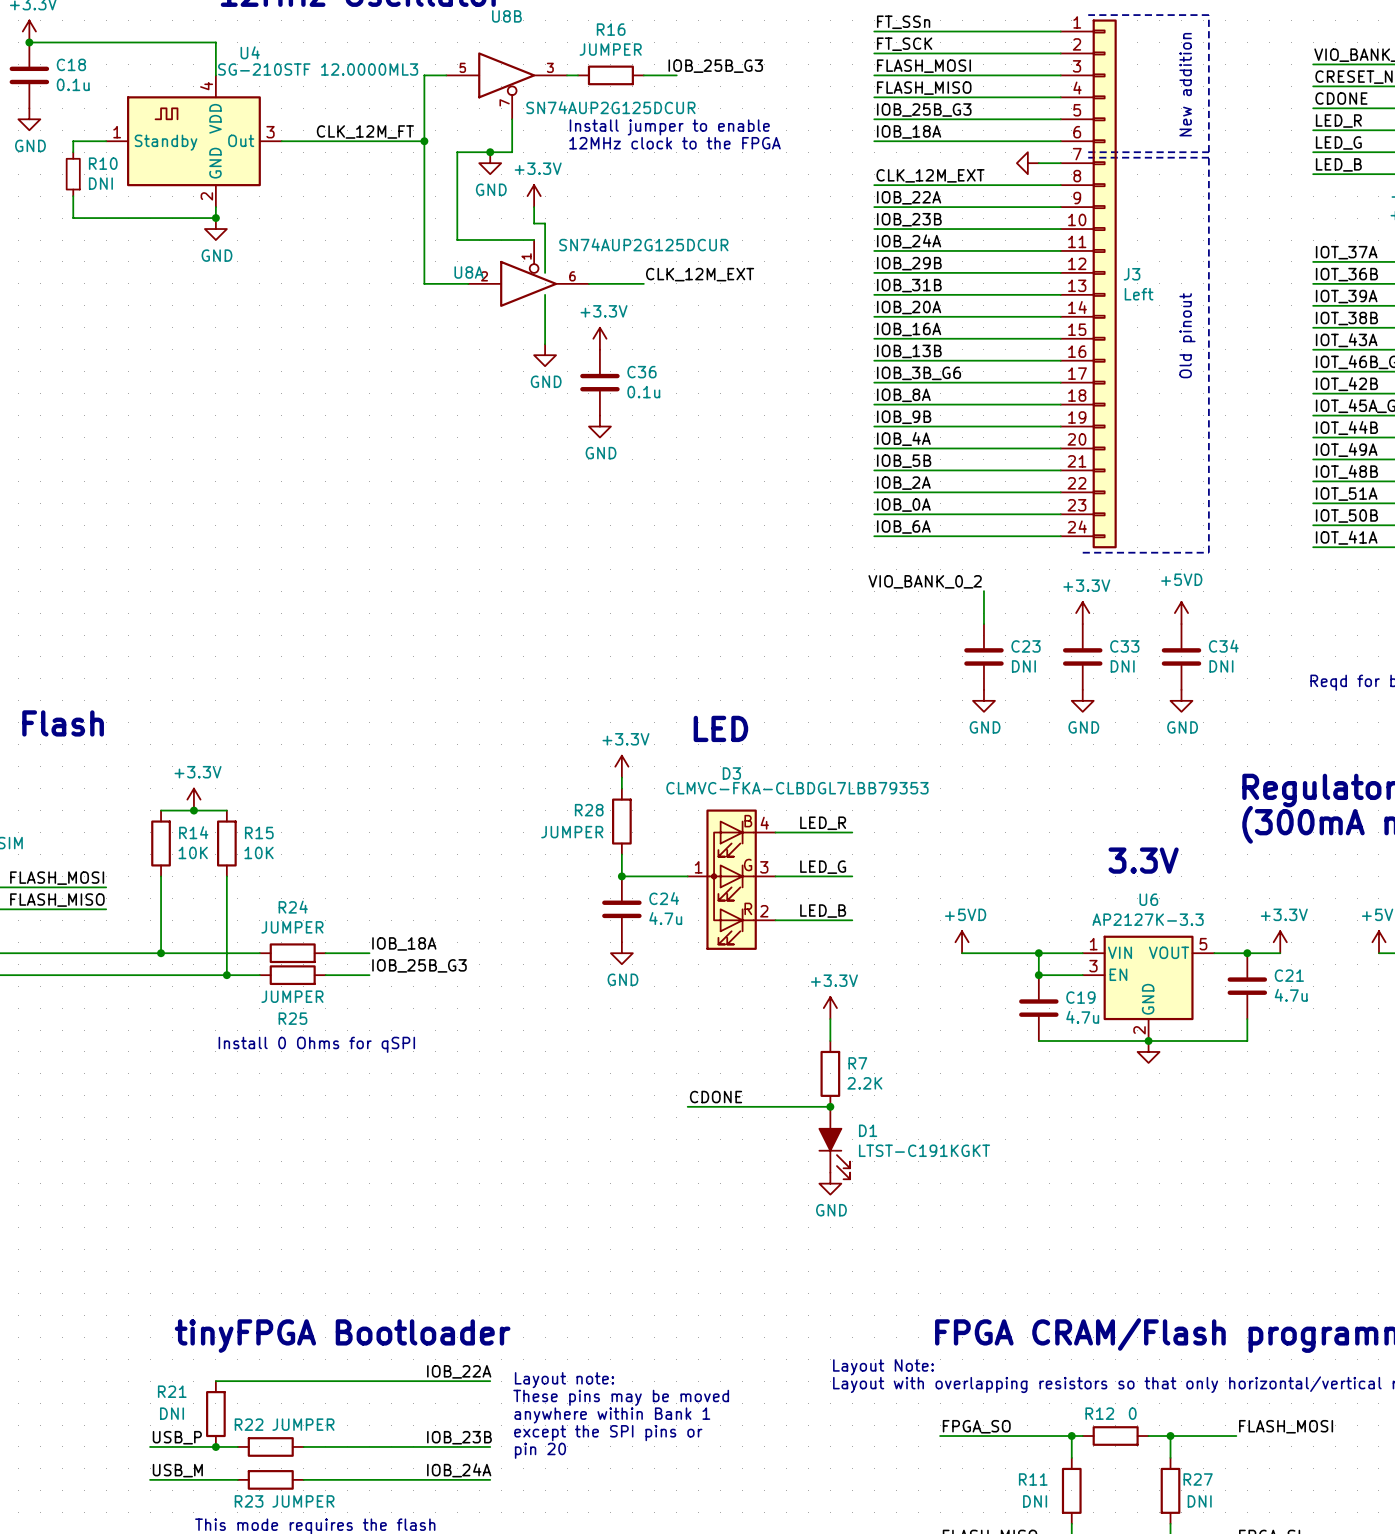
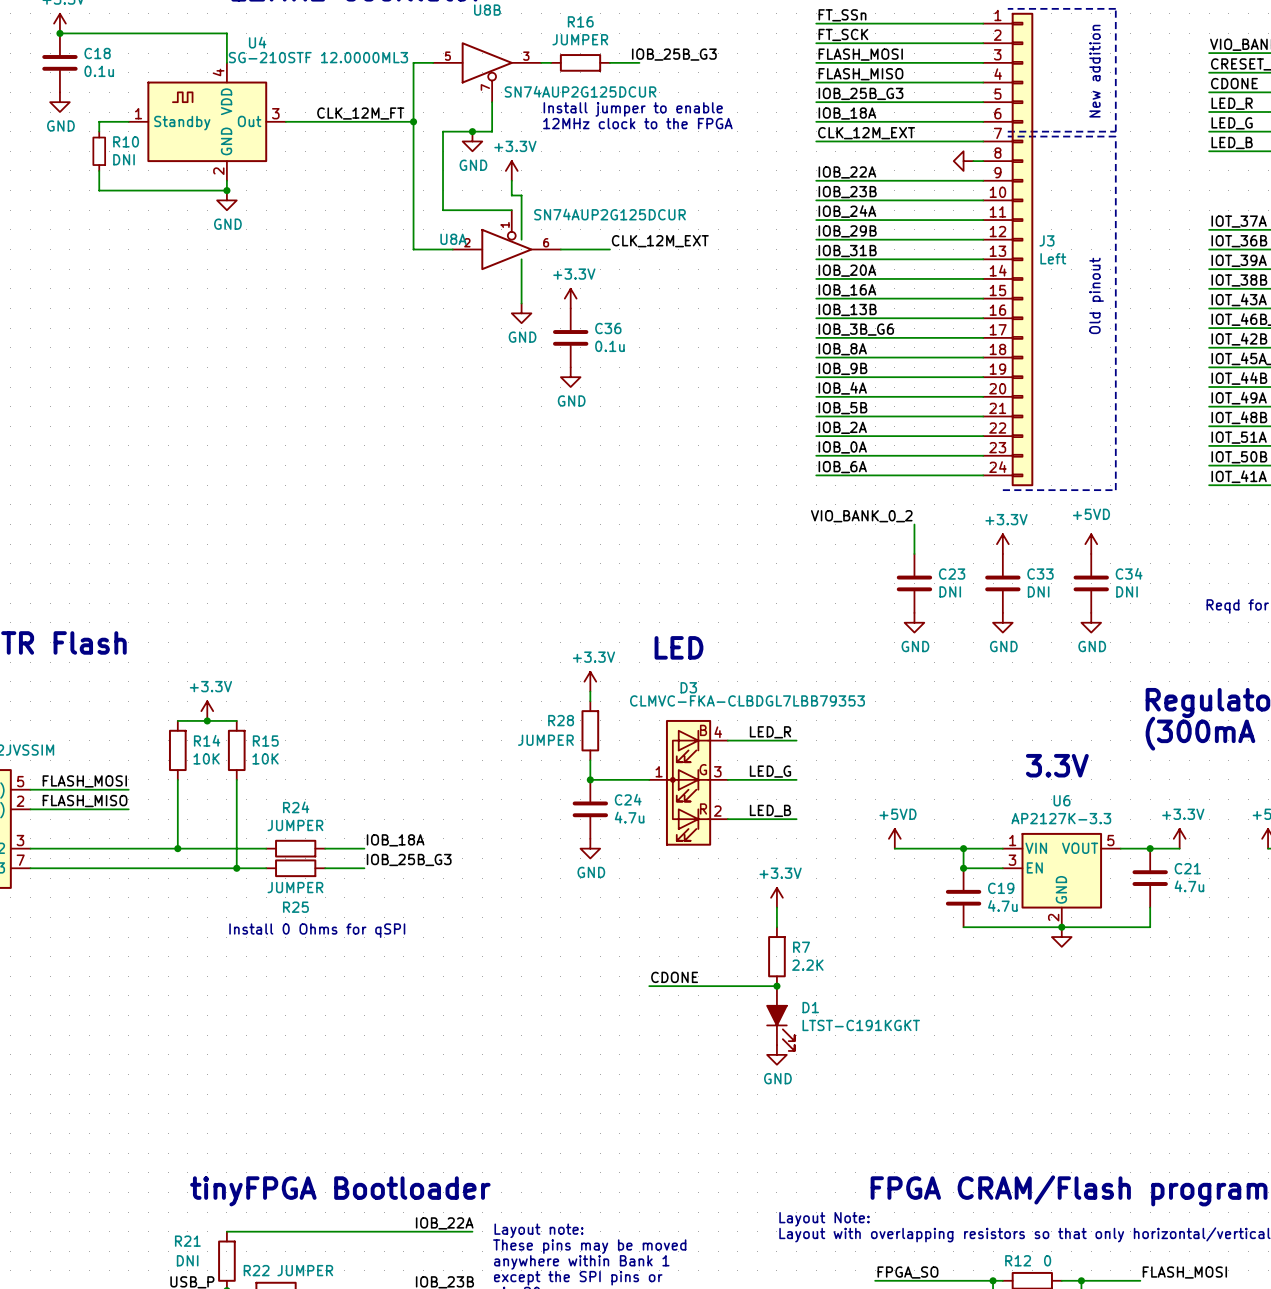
wire: none -> (816, 141) (963, 141)
power symbol position: (1027, 163) -> (963, 161)
label position: CLK_12M_EXT (930, 175) -> CLK_12M_EXT (866, 133)
wire: (874, 185) (1049, 185) -> none

